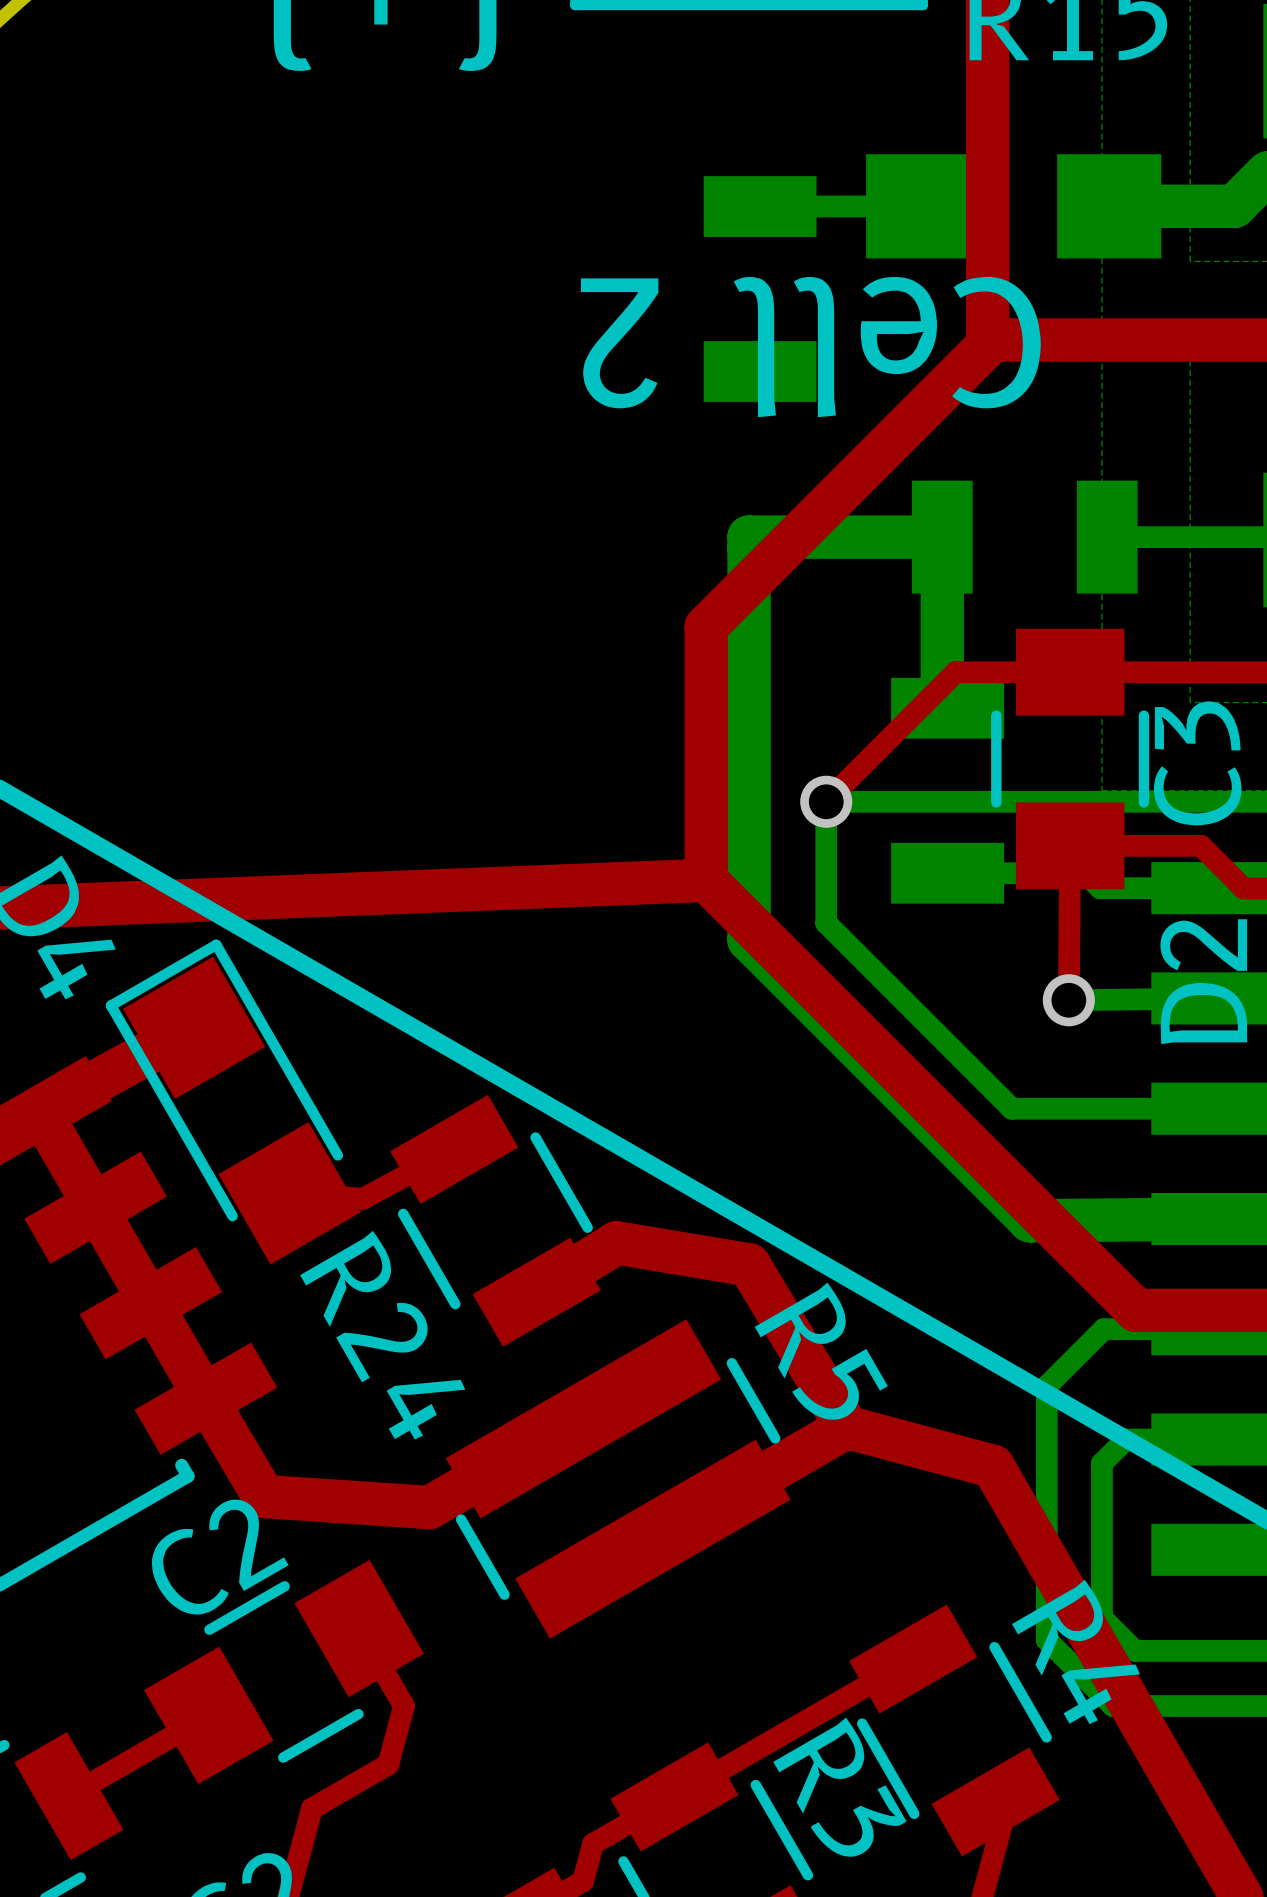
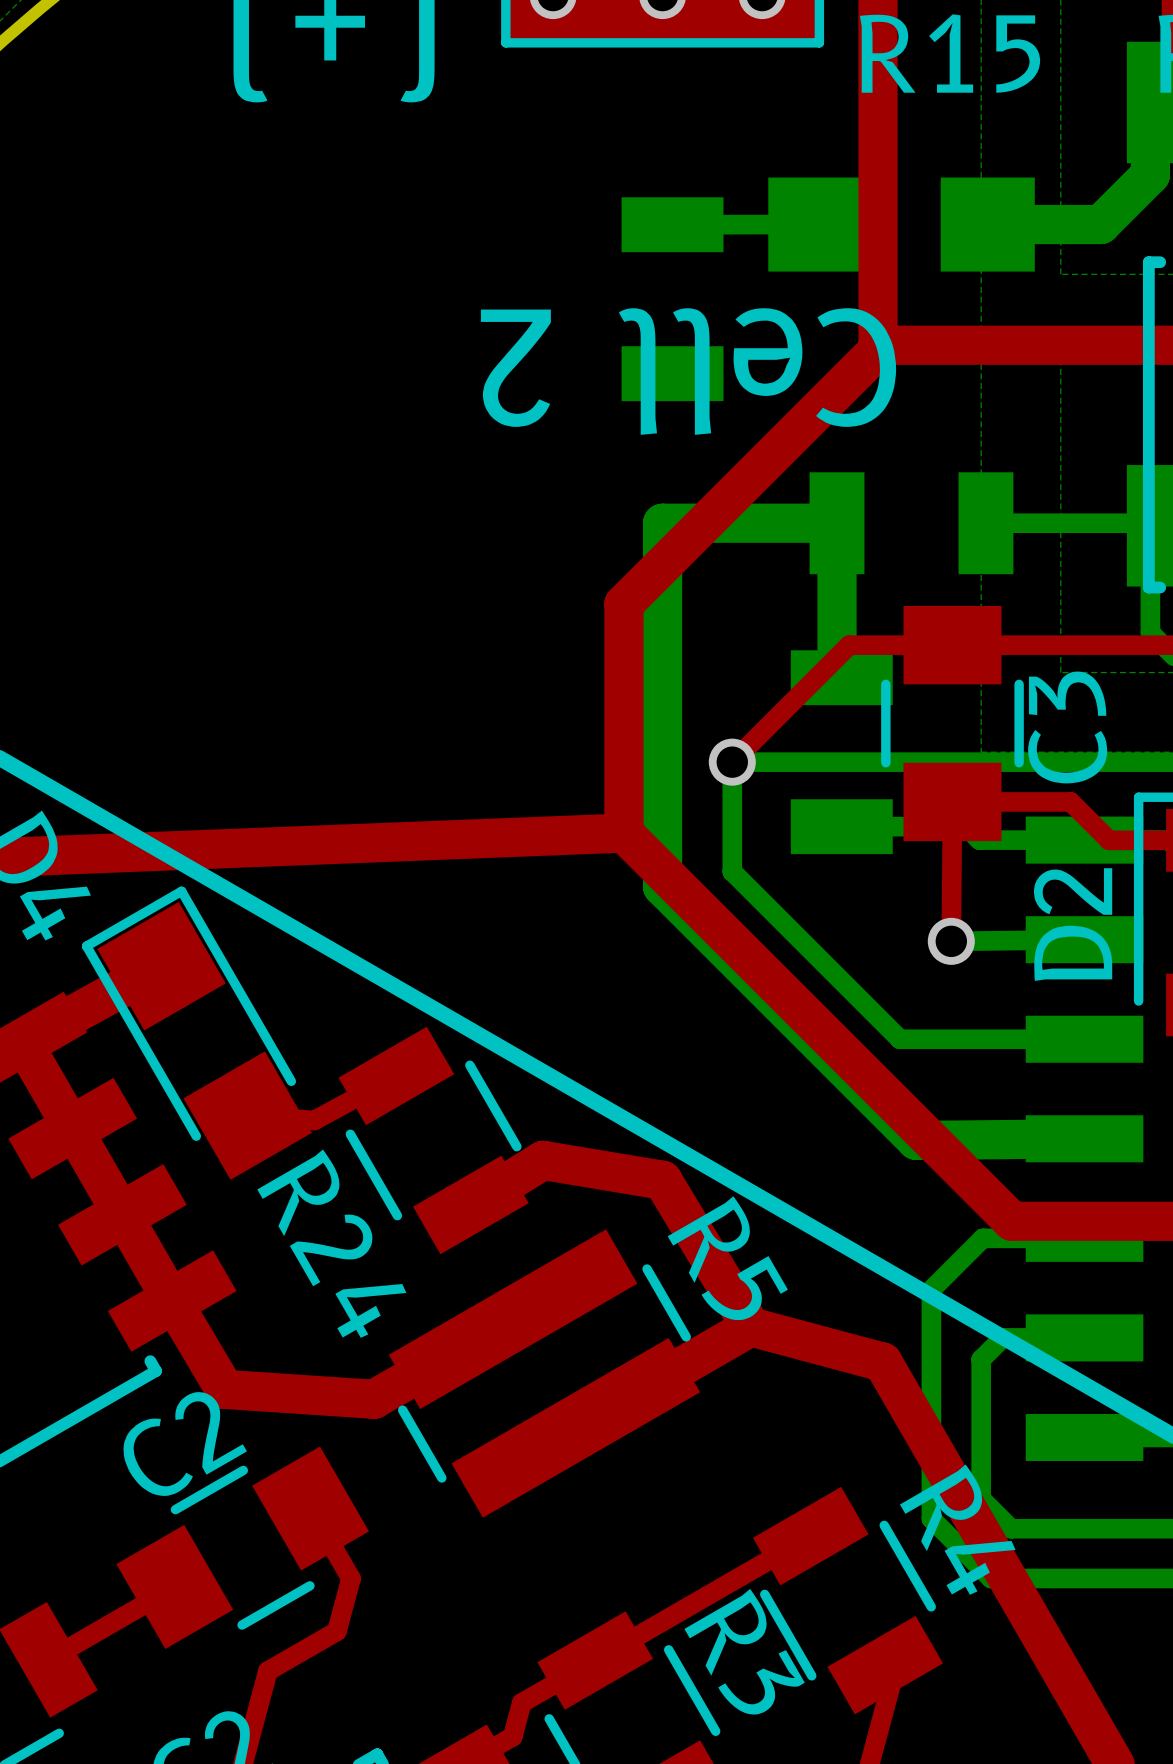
text position: Cell 2 (810, 347) -> Cell 2 (688, 371)

